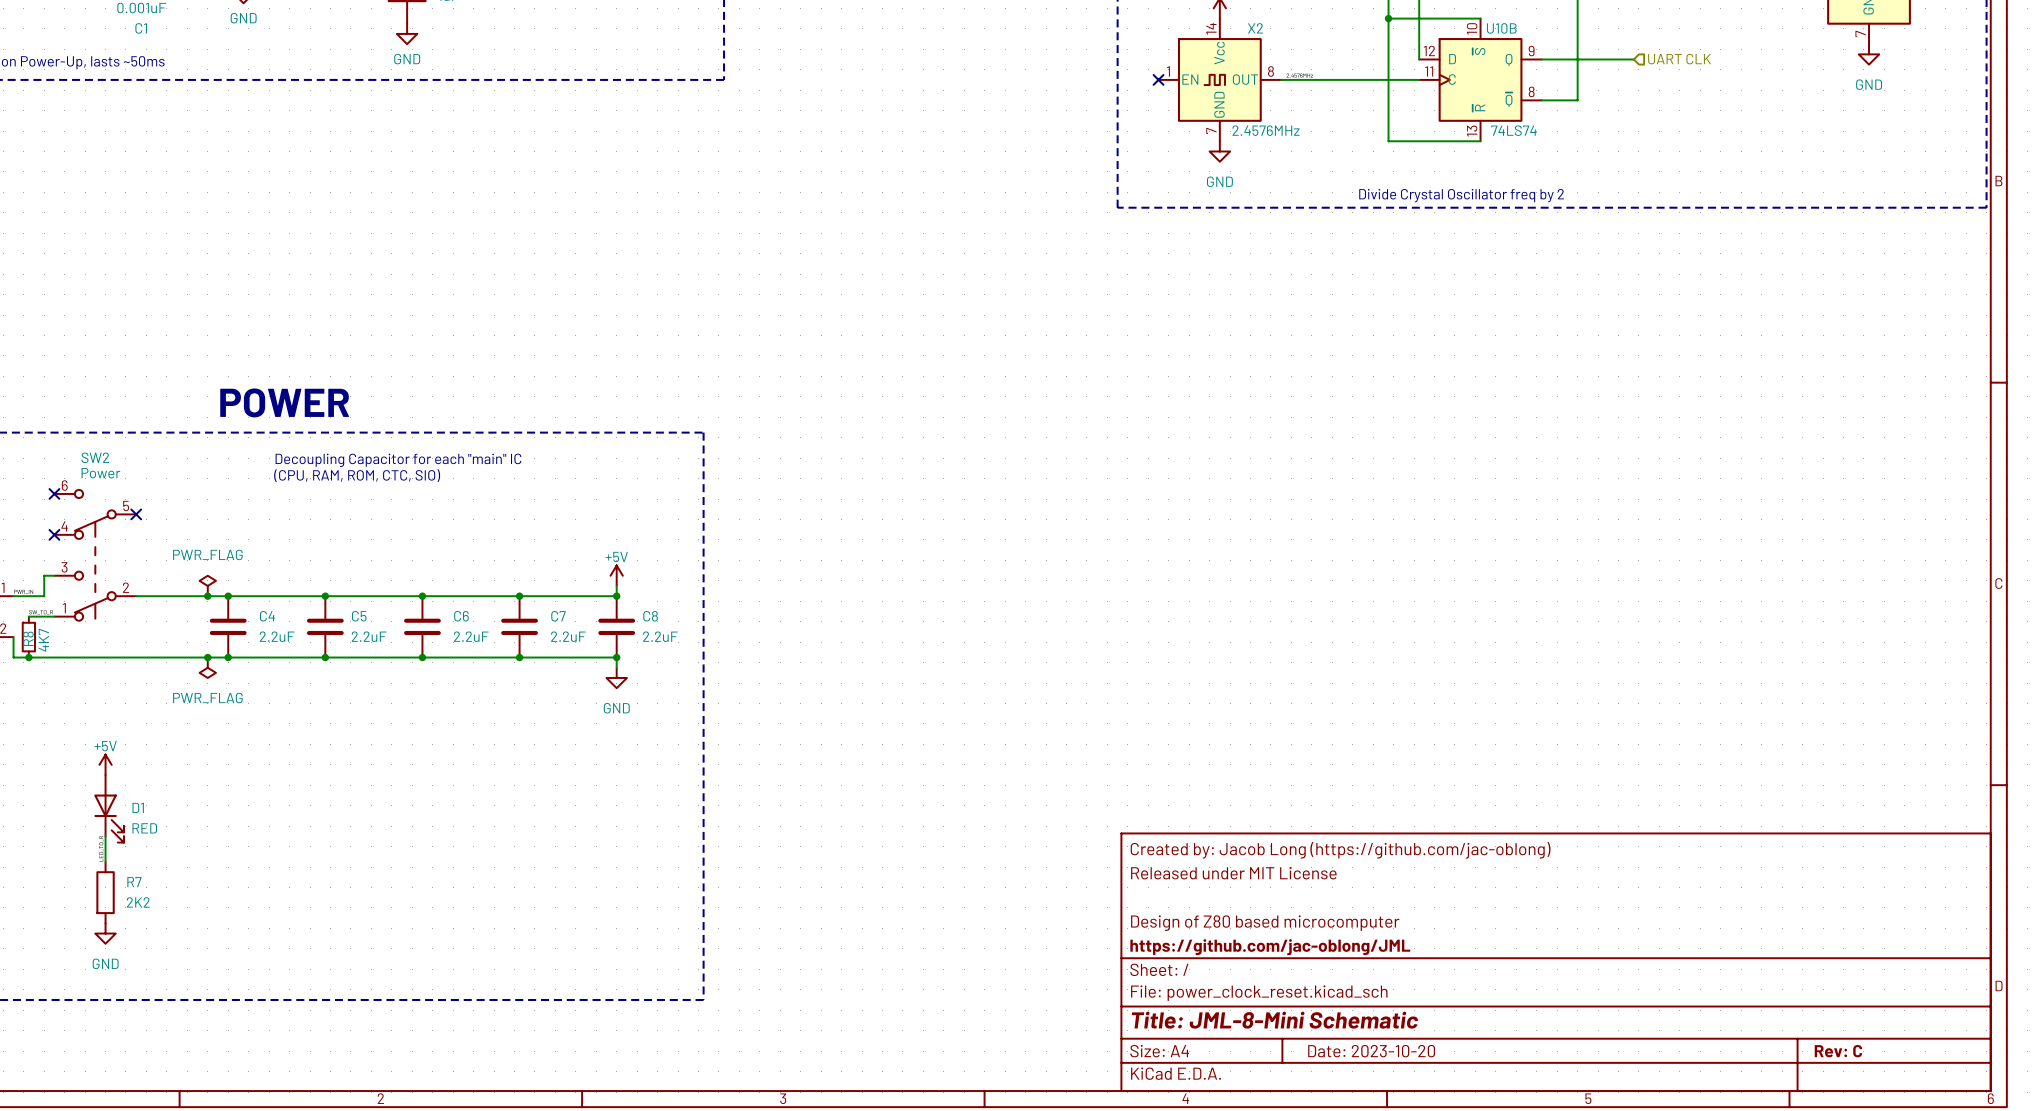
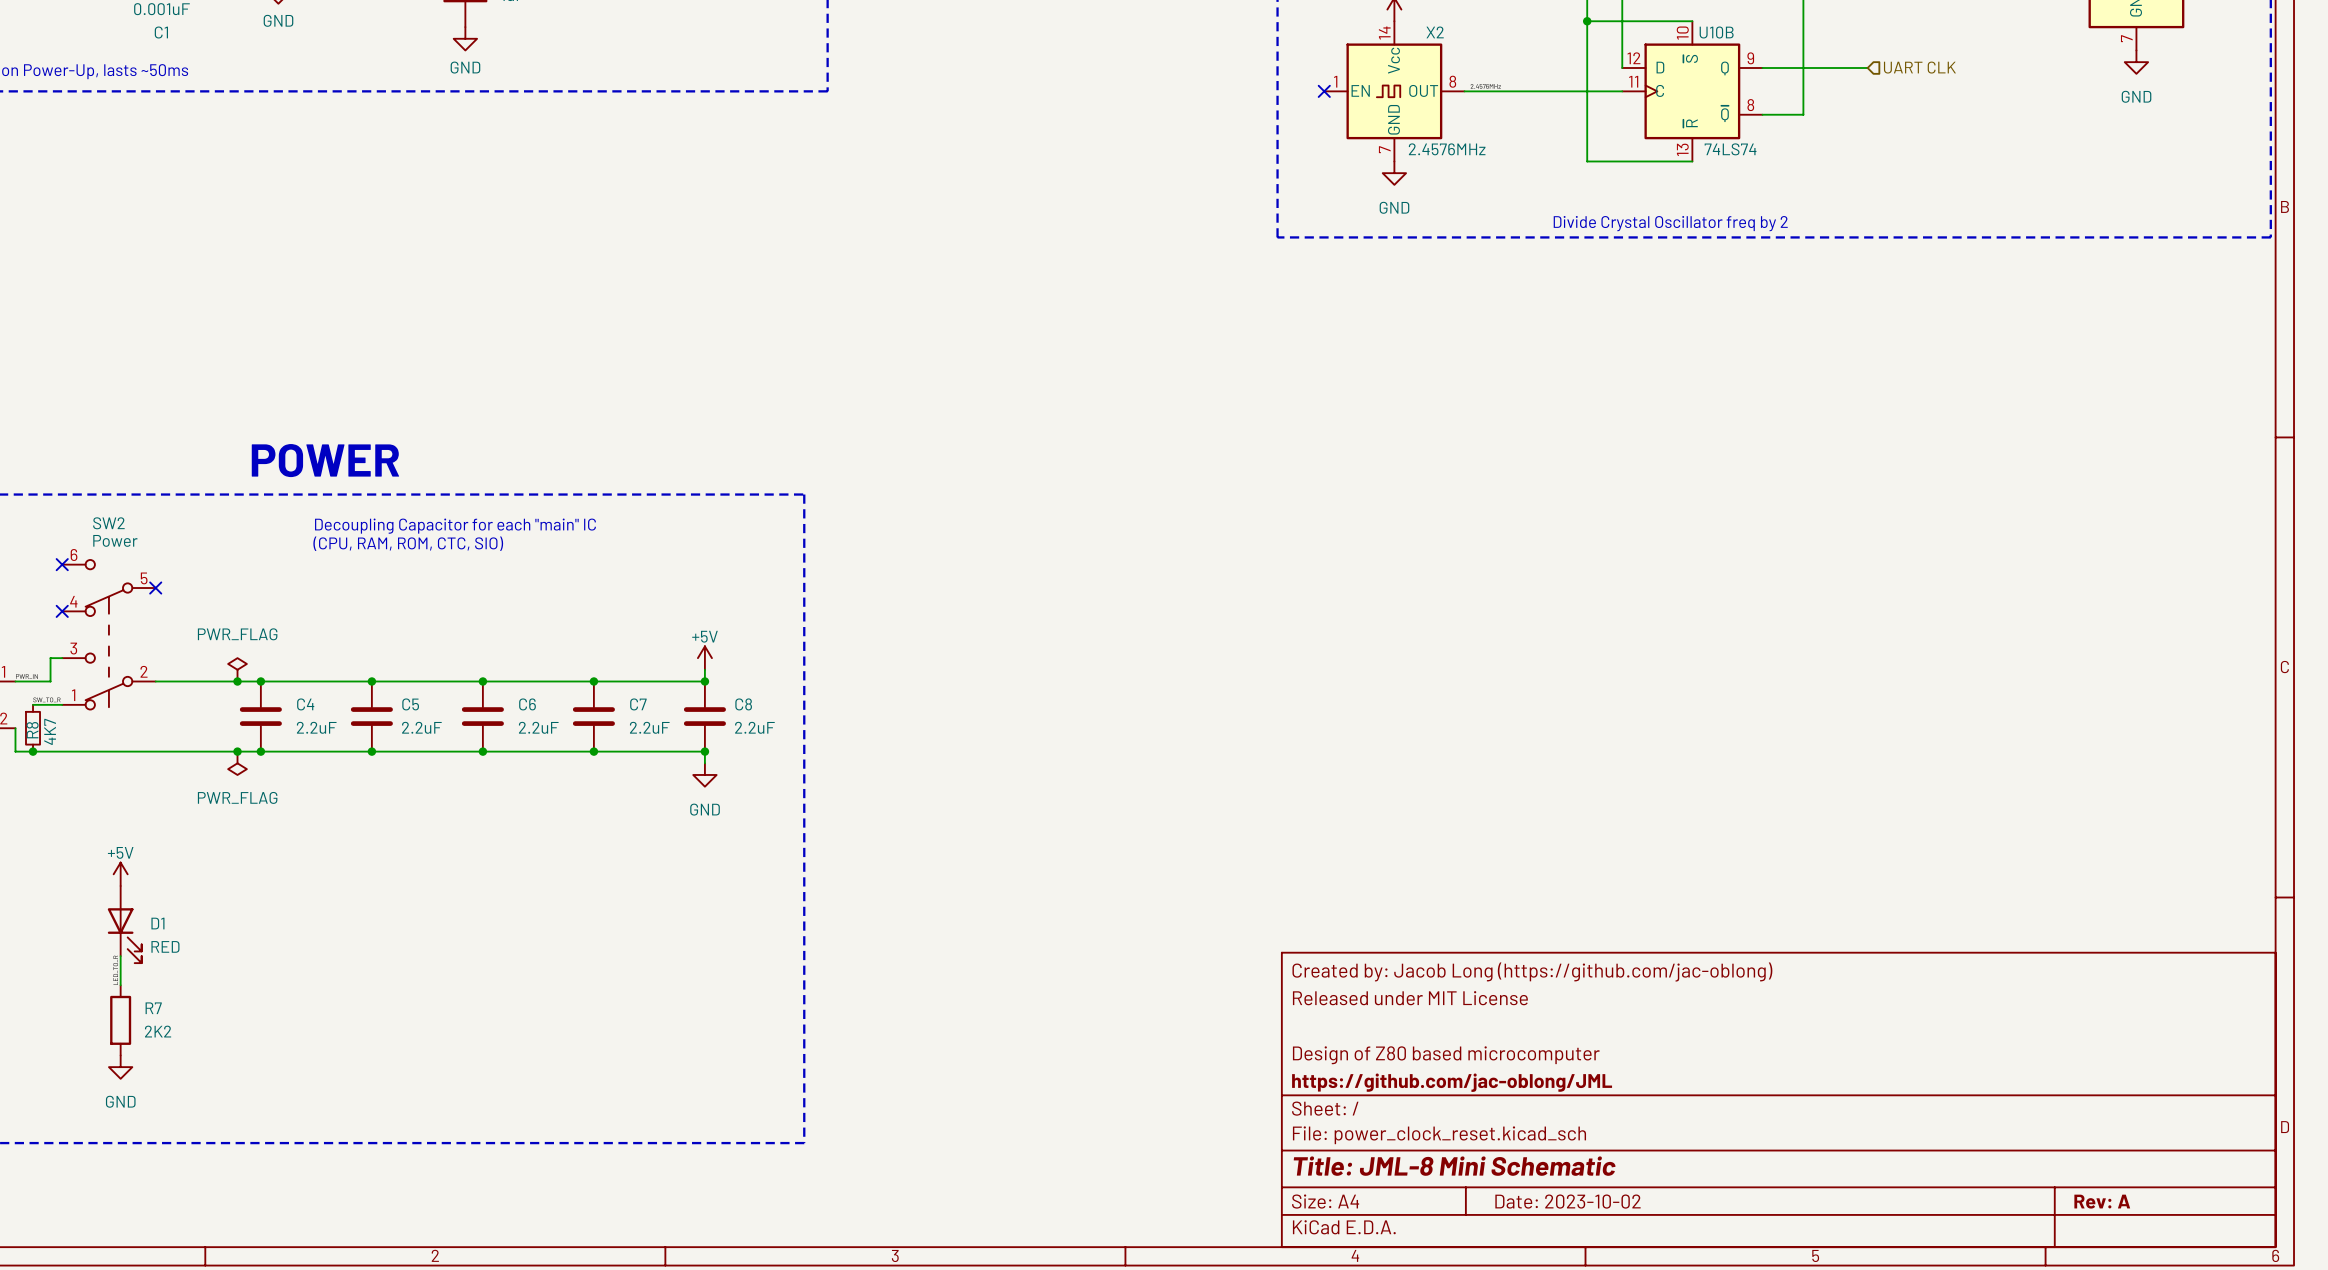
title block: Title: JML-8-Mini Schematic (1274, 1020) -> Title: JML-8 Mini Schematic (1454, 1166)
title block: Date: 2023-10-20 (1371, 1051) -> Date: 2023-10-02 (1567, 1201)
title block: Rev: C (1838, 1051) -> Rev: A (2102, 1201)

